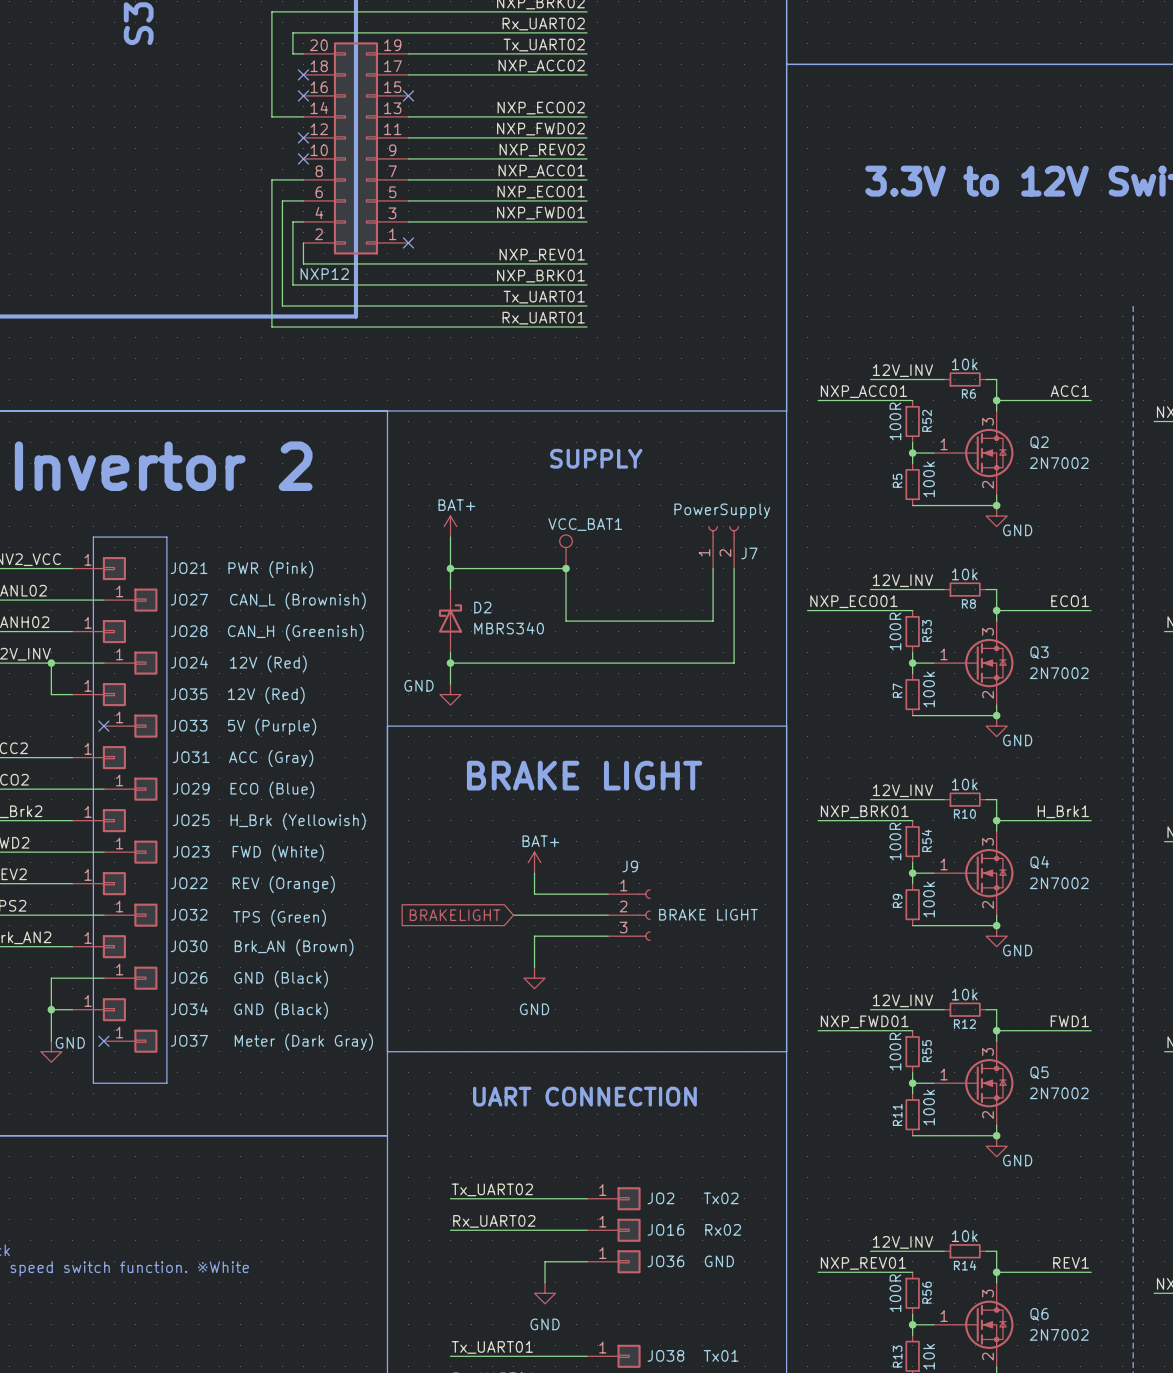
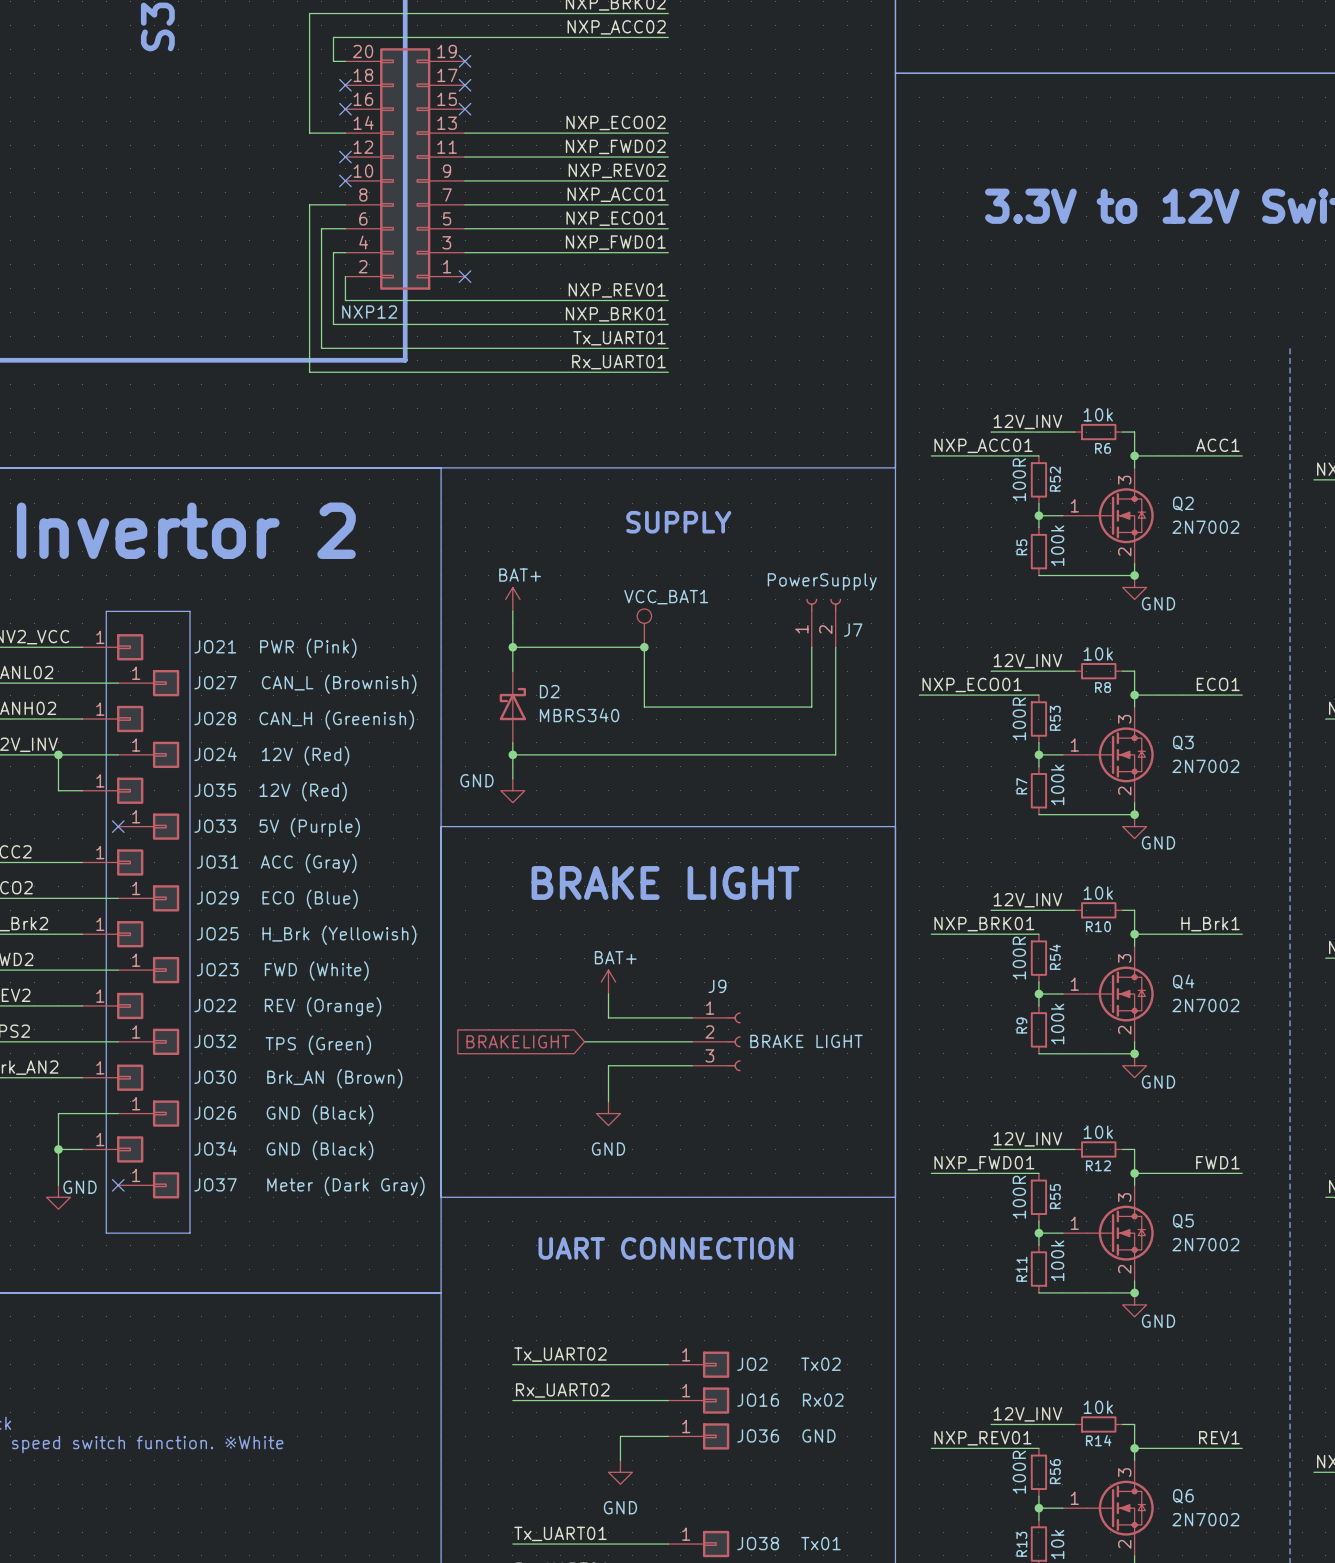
label: Rx_UART02 (543, 24) -> NXP_ACC02 (616, 27)
label: Tx_UART02 (544, 45) -> none
wire: (408, 53) (587, 53) -> none
no-connect mark: none -> (465, 61)
label: NXP_ACC02 (541, 66) -> none
wire: (408, 74) (587, 74) -> none
no-connect mark: none -> (465, 85)

